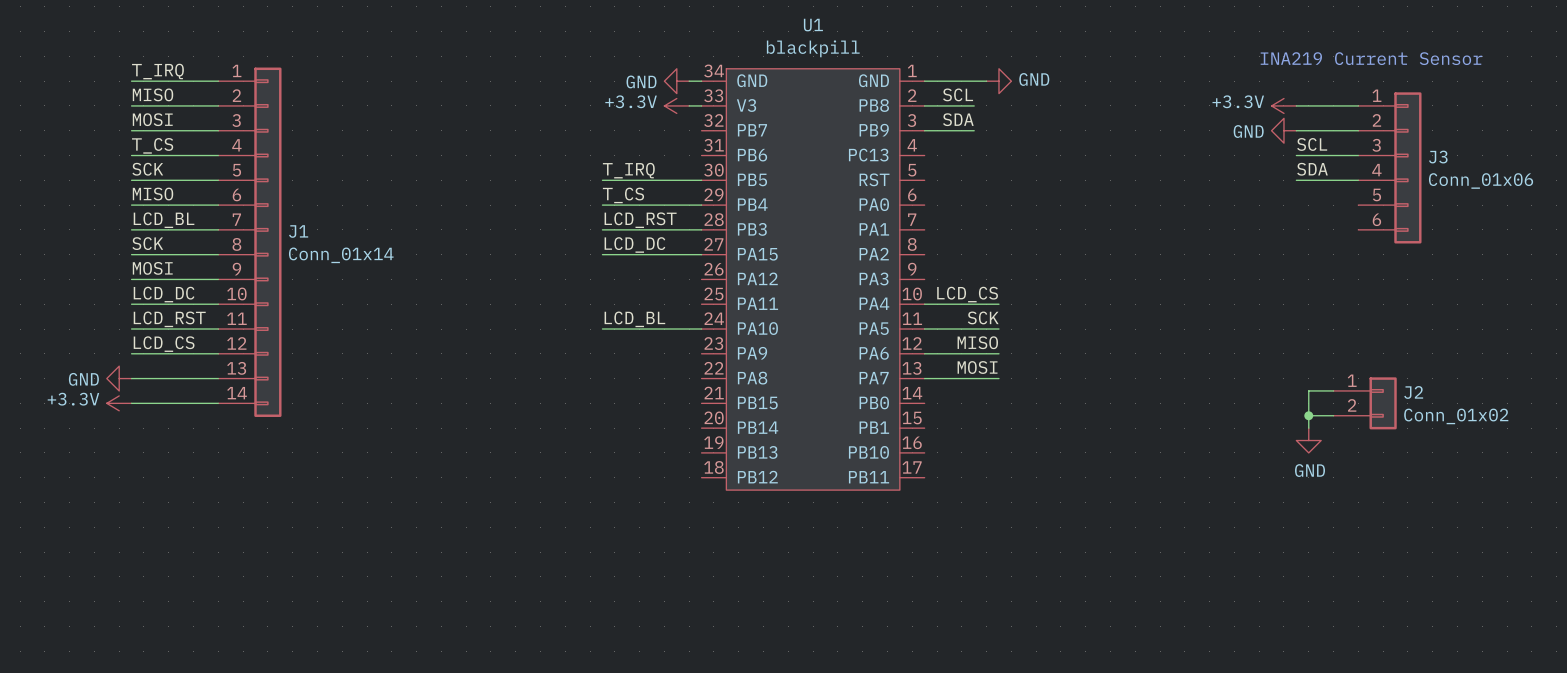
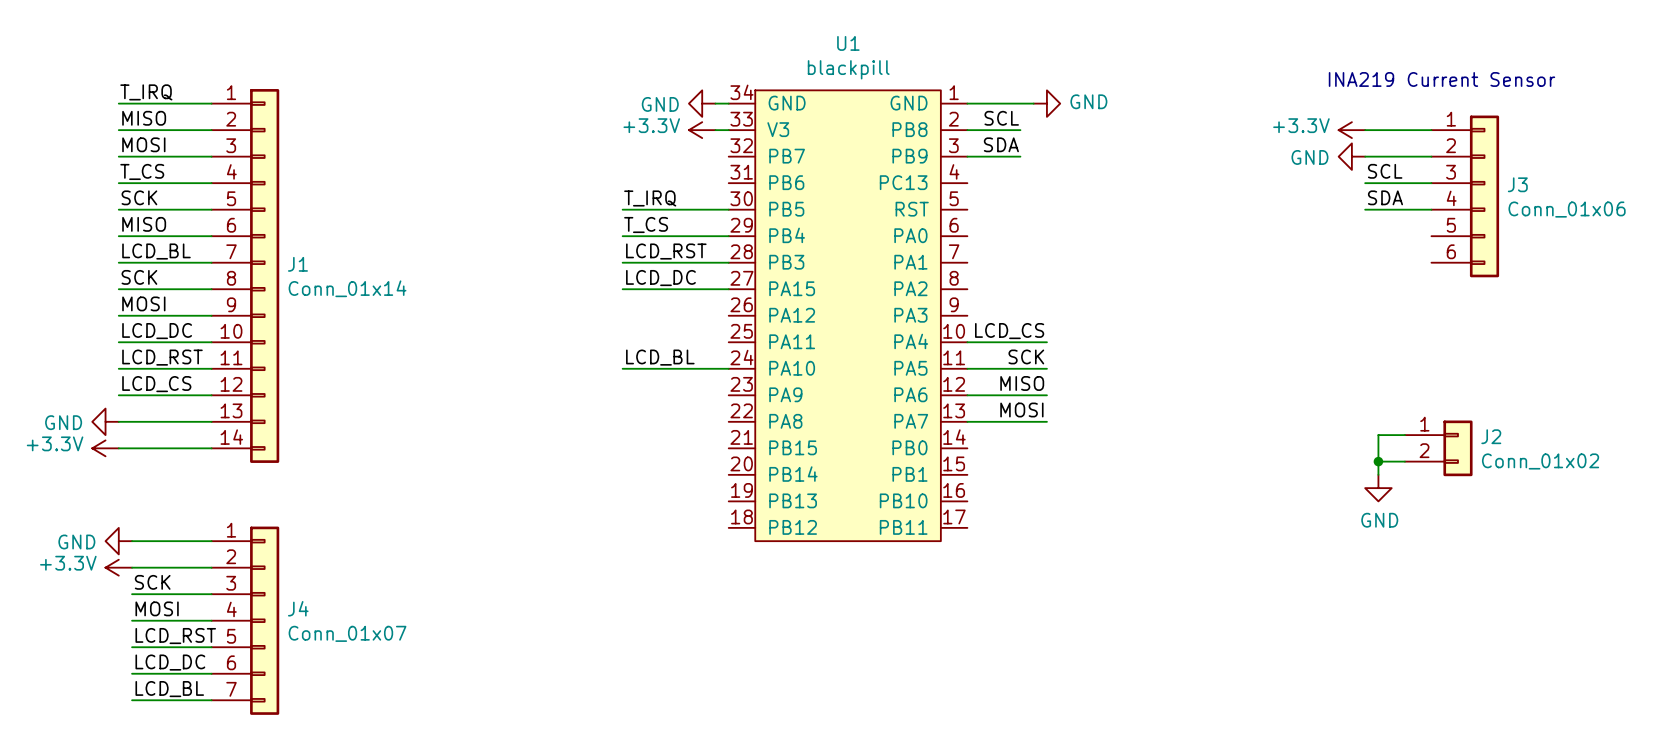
power symbol: none -> GND (118, 541)
wire: none -> (132, 541) (211, 541)
power symbol: none -> +3.3V (118, 567)
wire: none -> (132, 567) (211, 567)
label: none -> SCK (152, 582)
wire: none -> (132, 594) (211, 594)
label: none -> MOSI (157, 608)
wire: none -> (132, 620) (211, 620)
J4: none -> Conn_01x07 (245, 620)
label: none -> LCD_RST (175, 636)
wire: none -> (132, 647) (211, 647)
label: none -> LCD_DC (170, 662)
wire: none -> (132, 673) (211, 673)
label: none -> LCD_BL (169, 689)
wire: none -> (132, 700) (211, 700)

